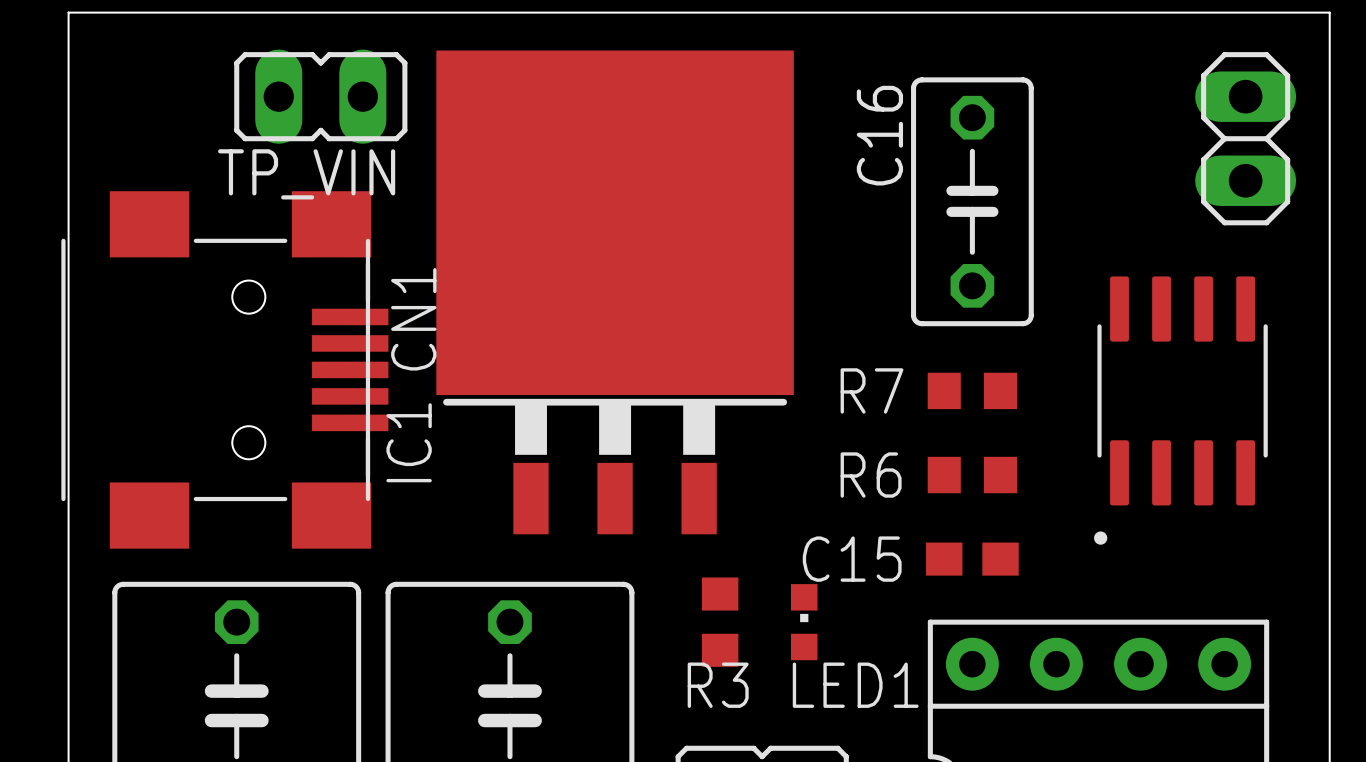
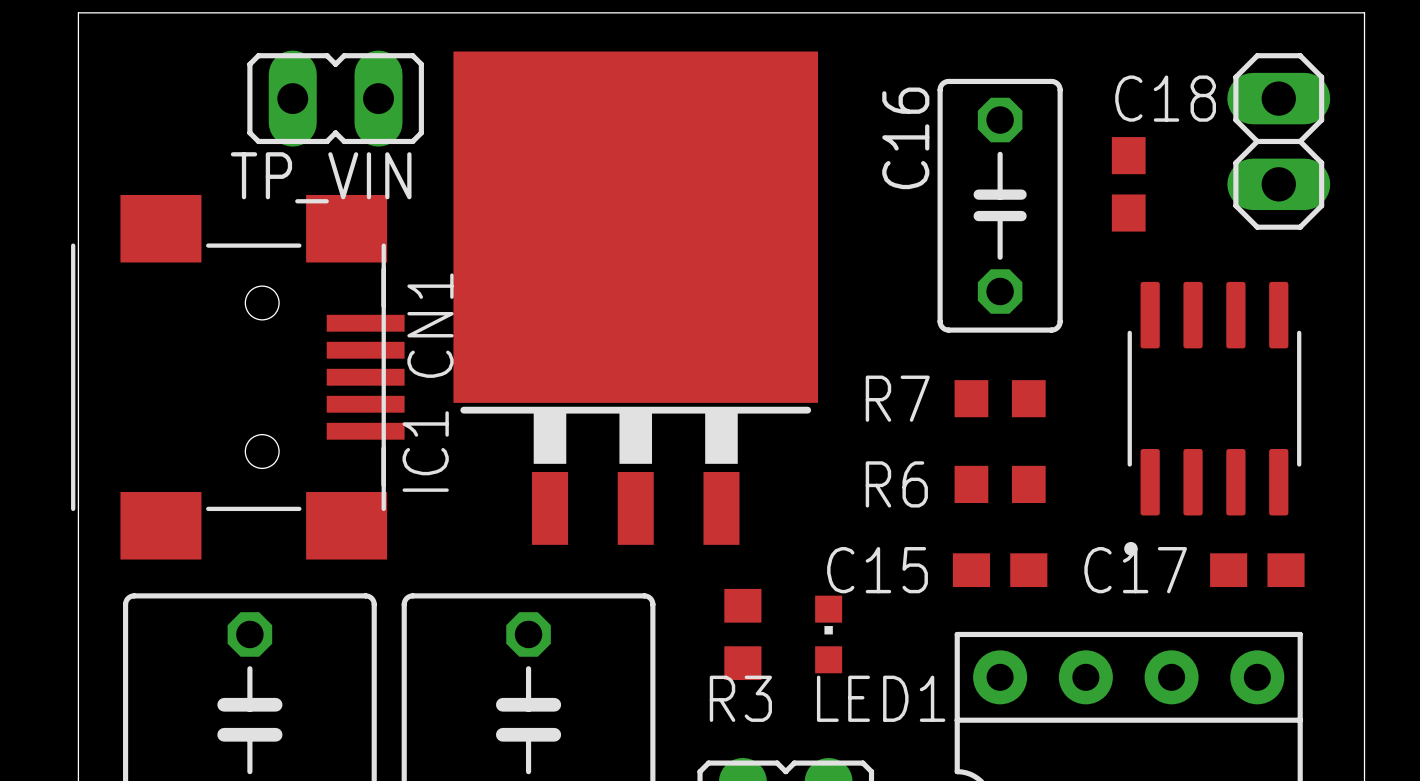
C18: none -> (1128, 184)
C17: none -> (1257, 570)

